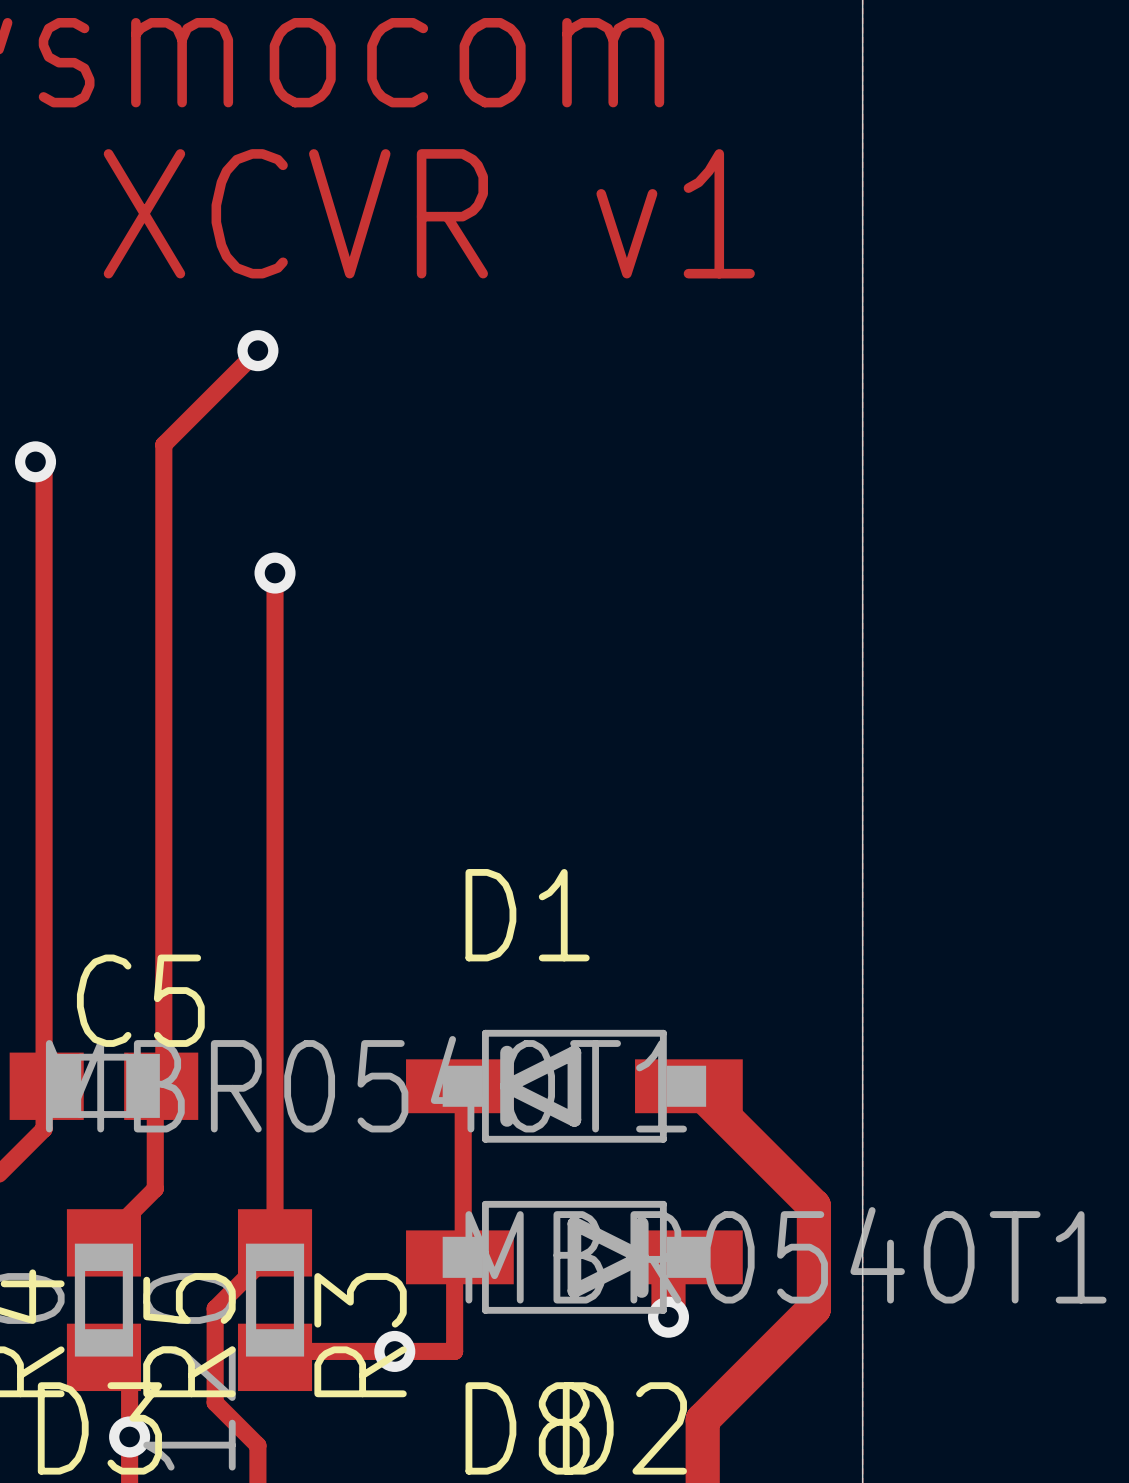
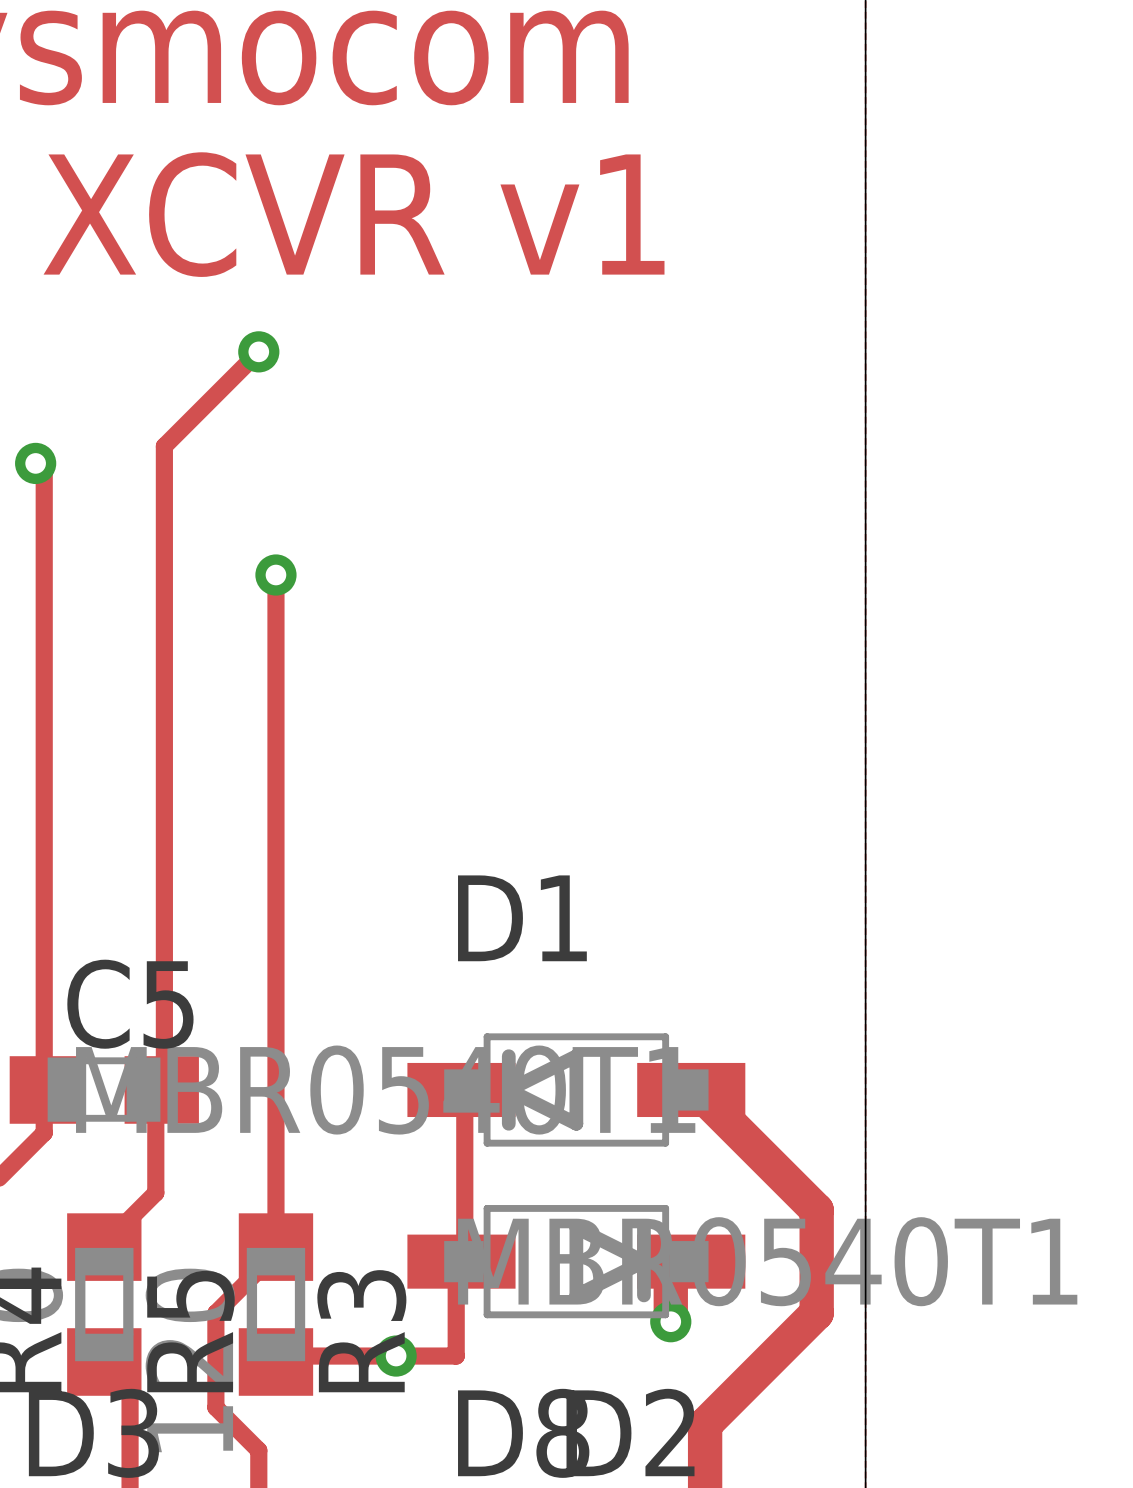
via: (129, 1436) -> none

